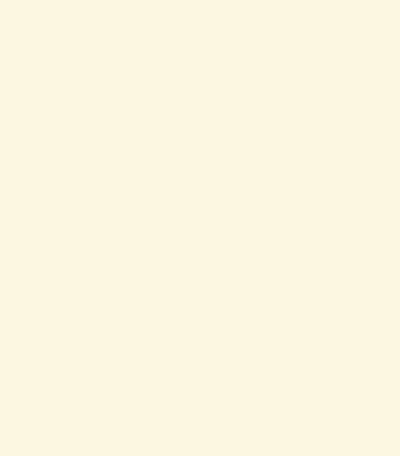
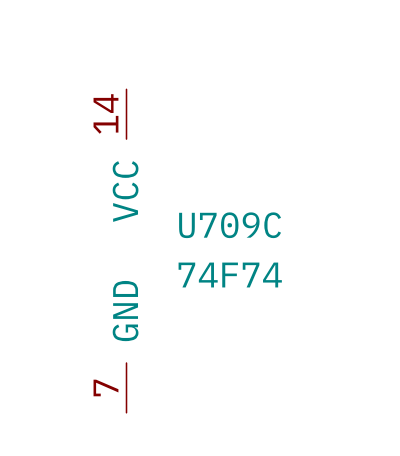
U709C: none -> 74F74 (126, 251)

